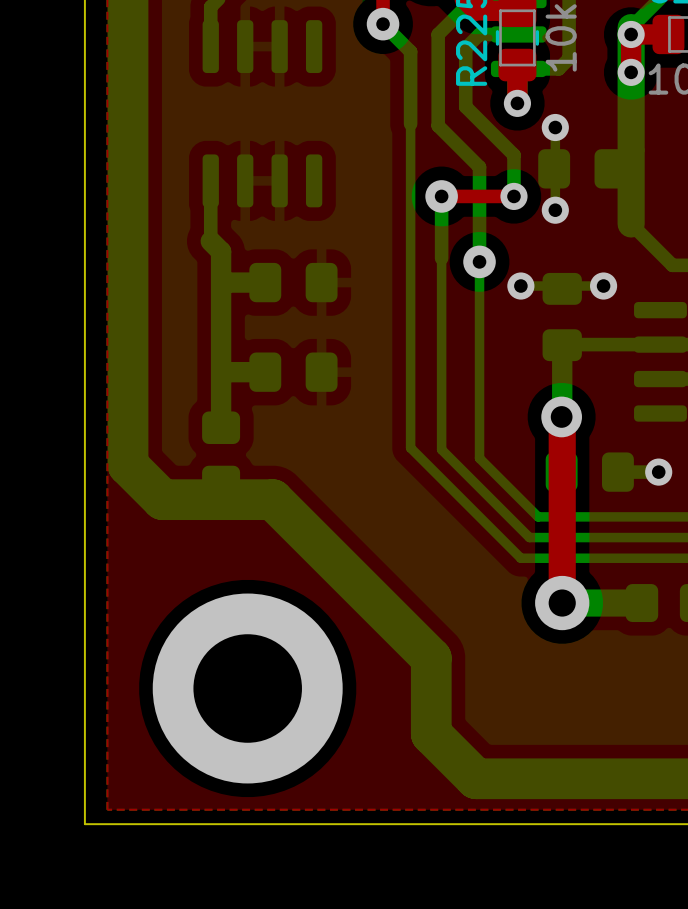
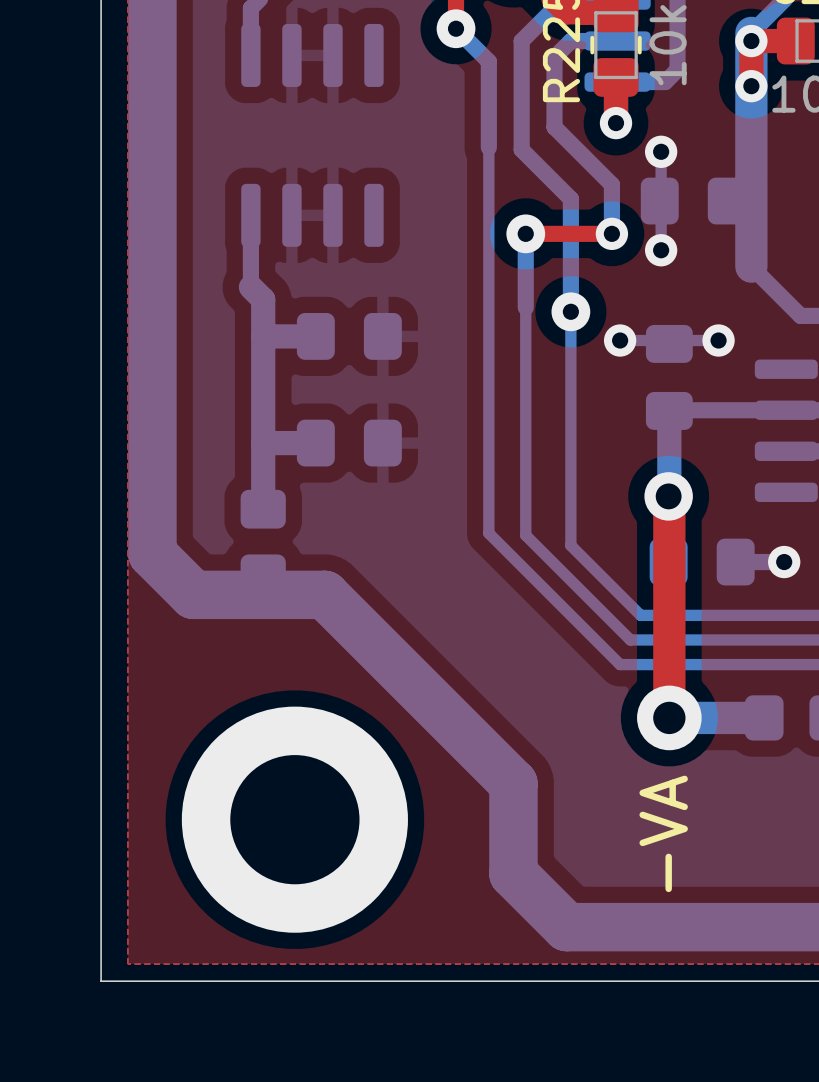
text: none -> -VA (663, 833)

